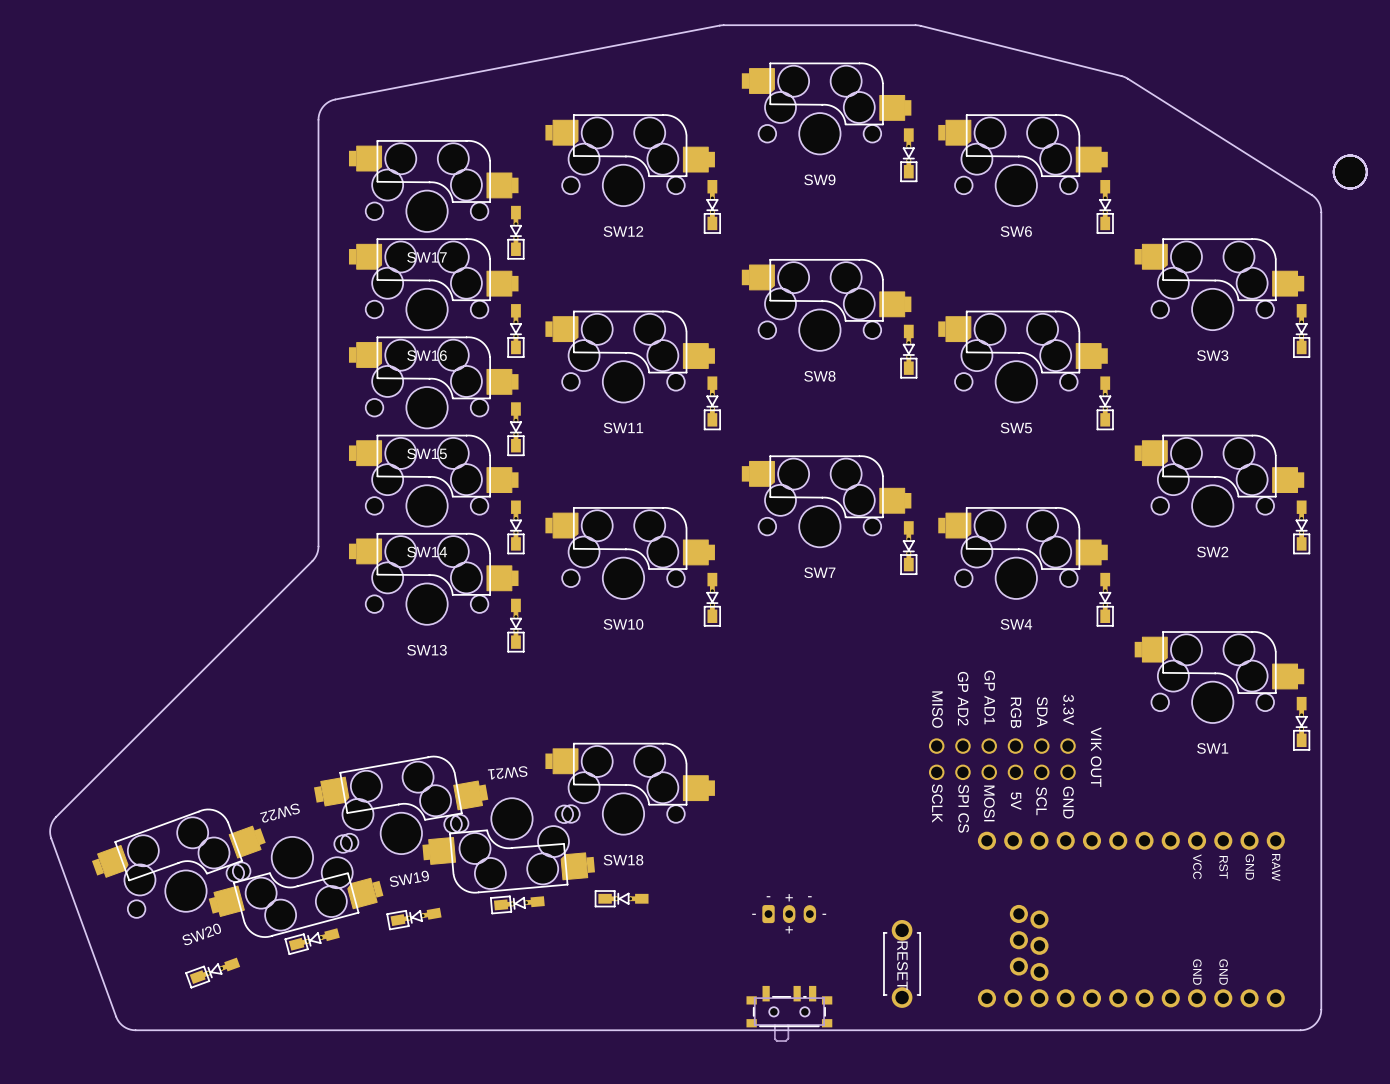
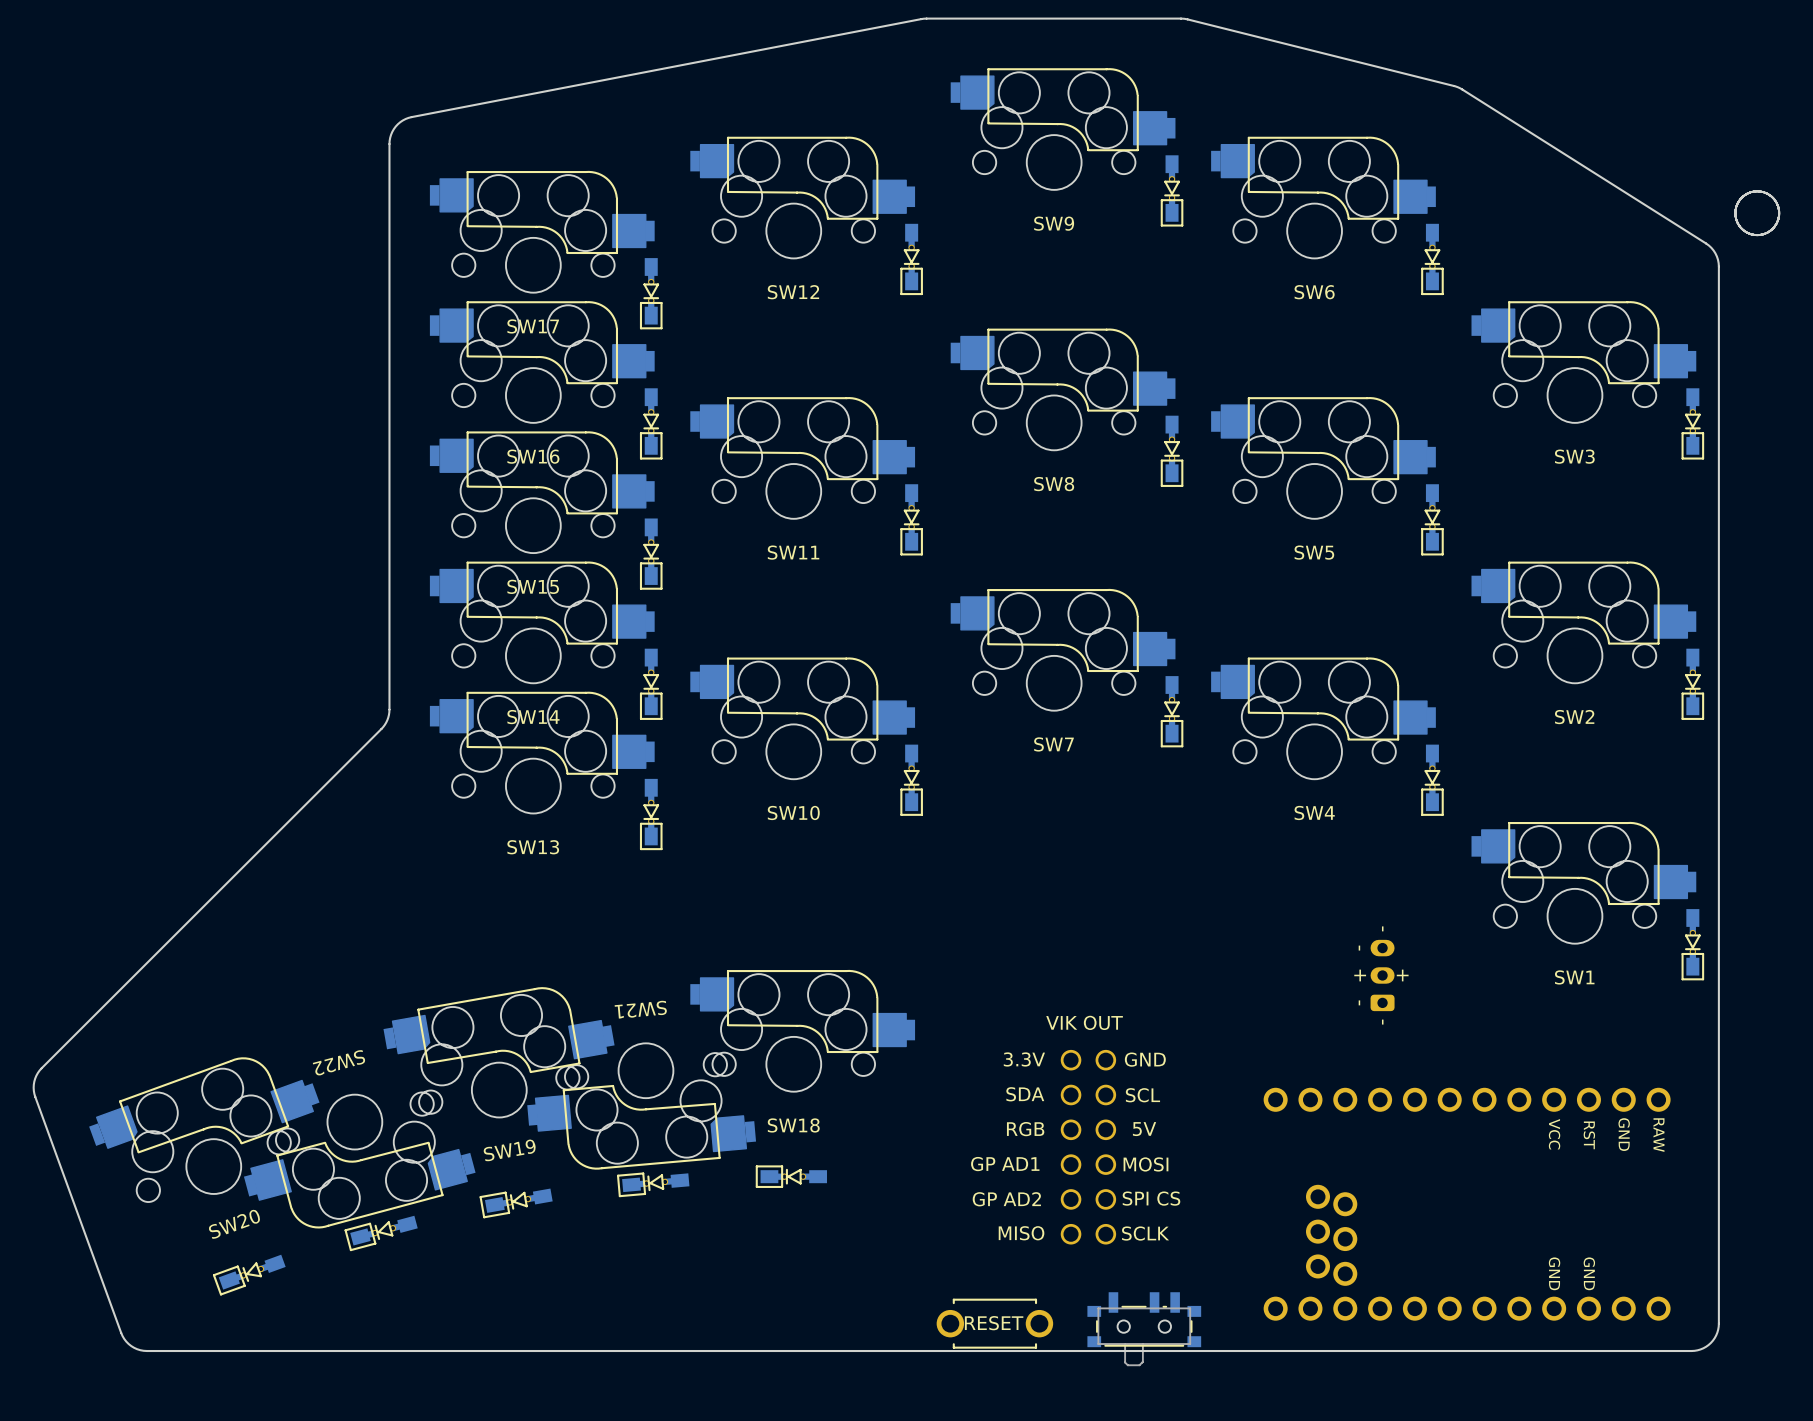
part: none -> (1382, 975)
part rotation: 0° (1002, 759) -> 90° counterclockwise (1088, 1147)
part position: (1002, 759) -> (1088, 1147)
part: (789, 914) -> none
part rotation: 0° (902, 963) -> 90° clockwise (994, 1323)
part position: (902, 963) -> (994, 1323)
part position: (789, 1013) -> (1144, 1329)

